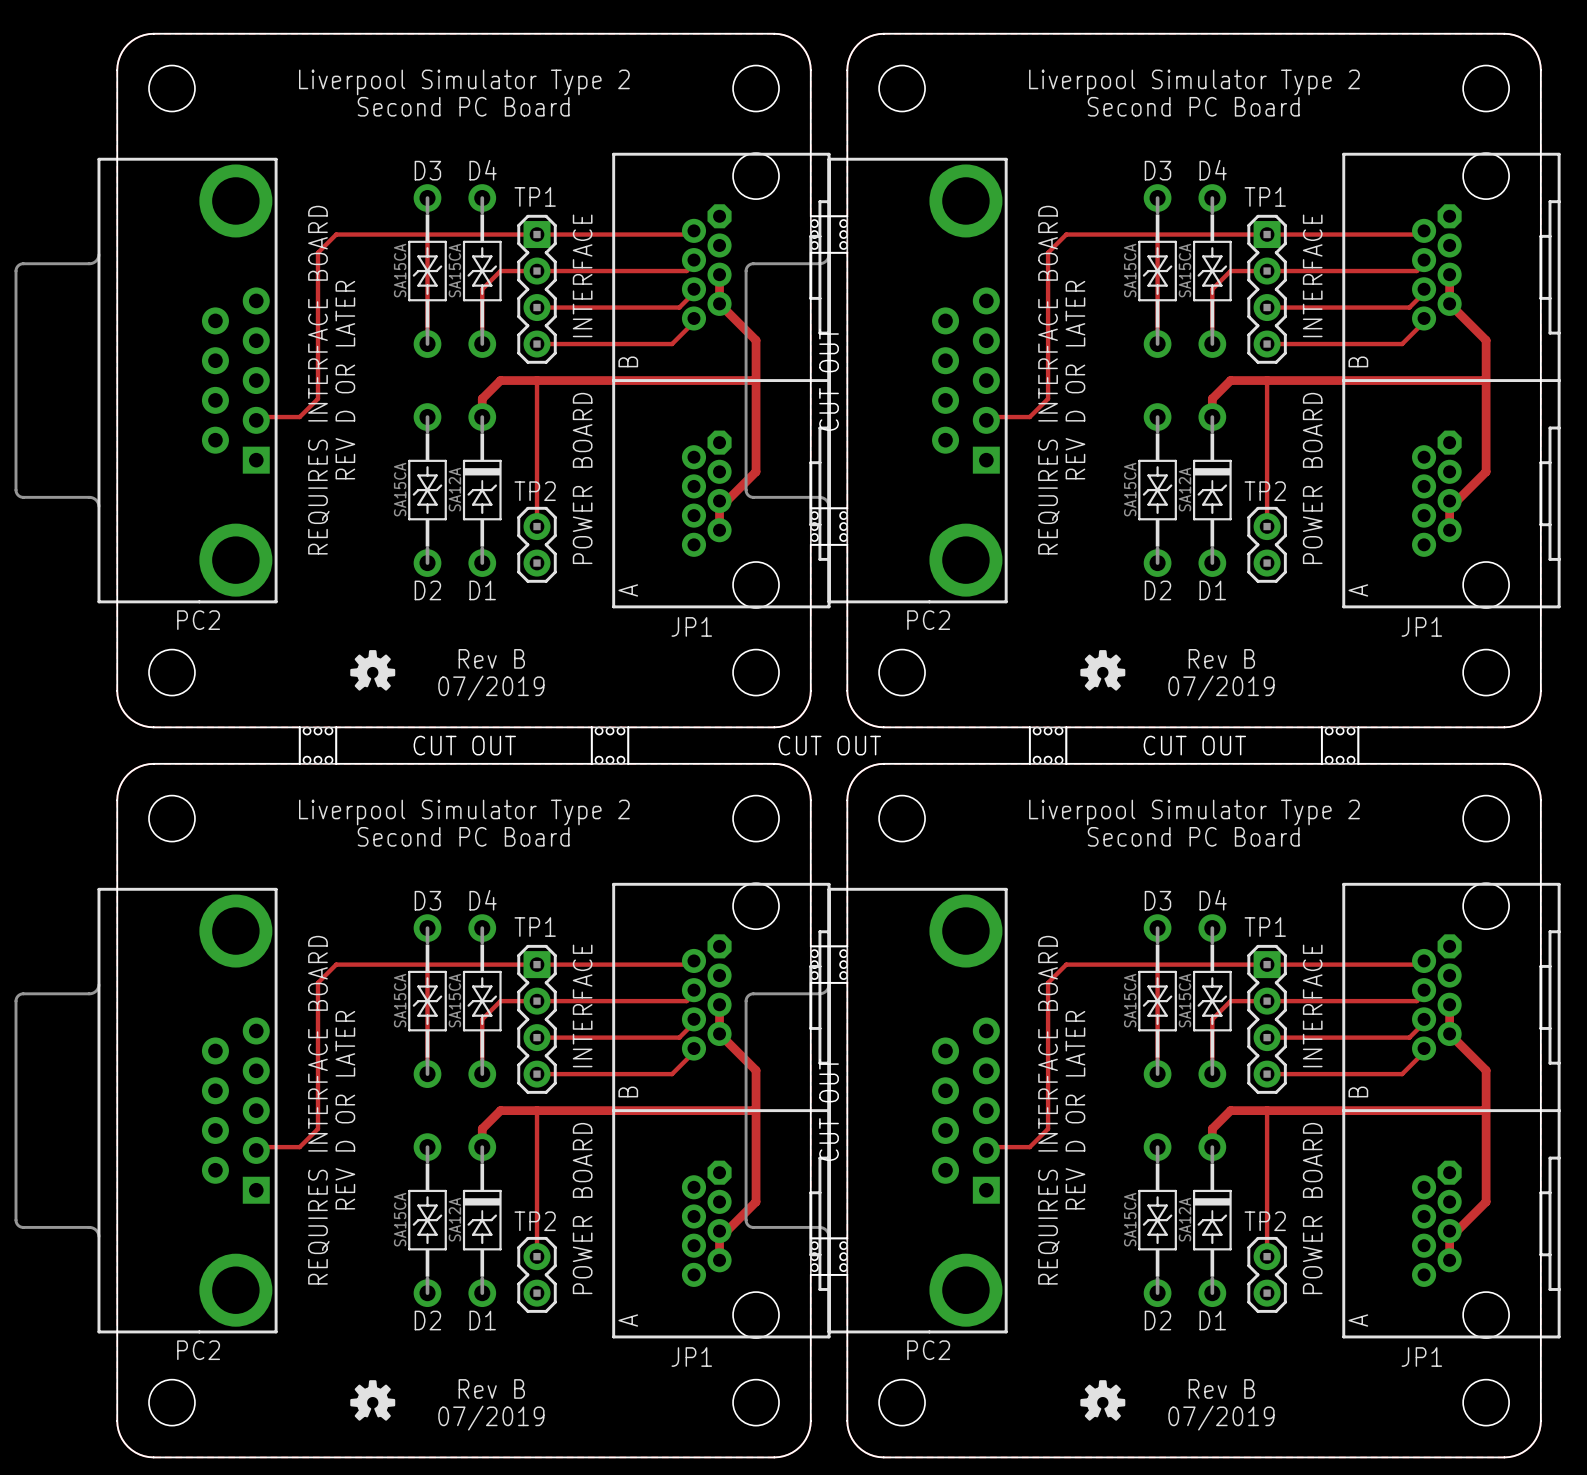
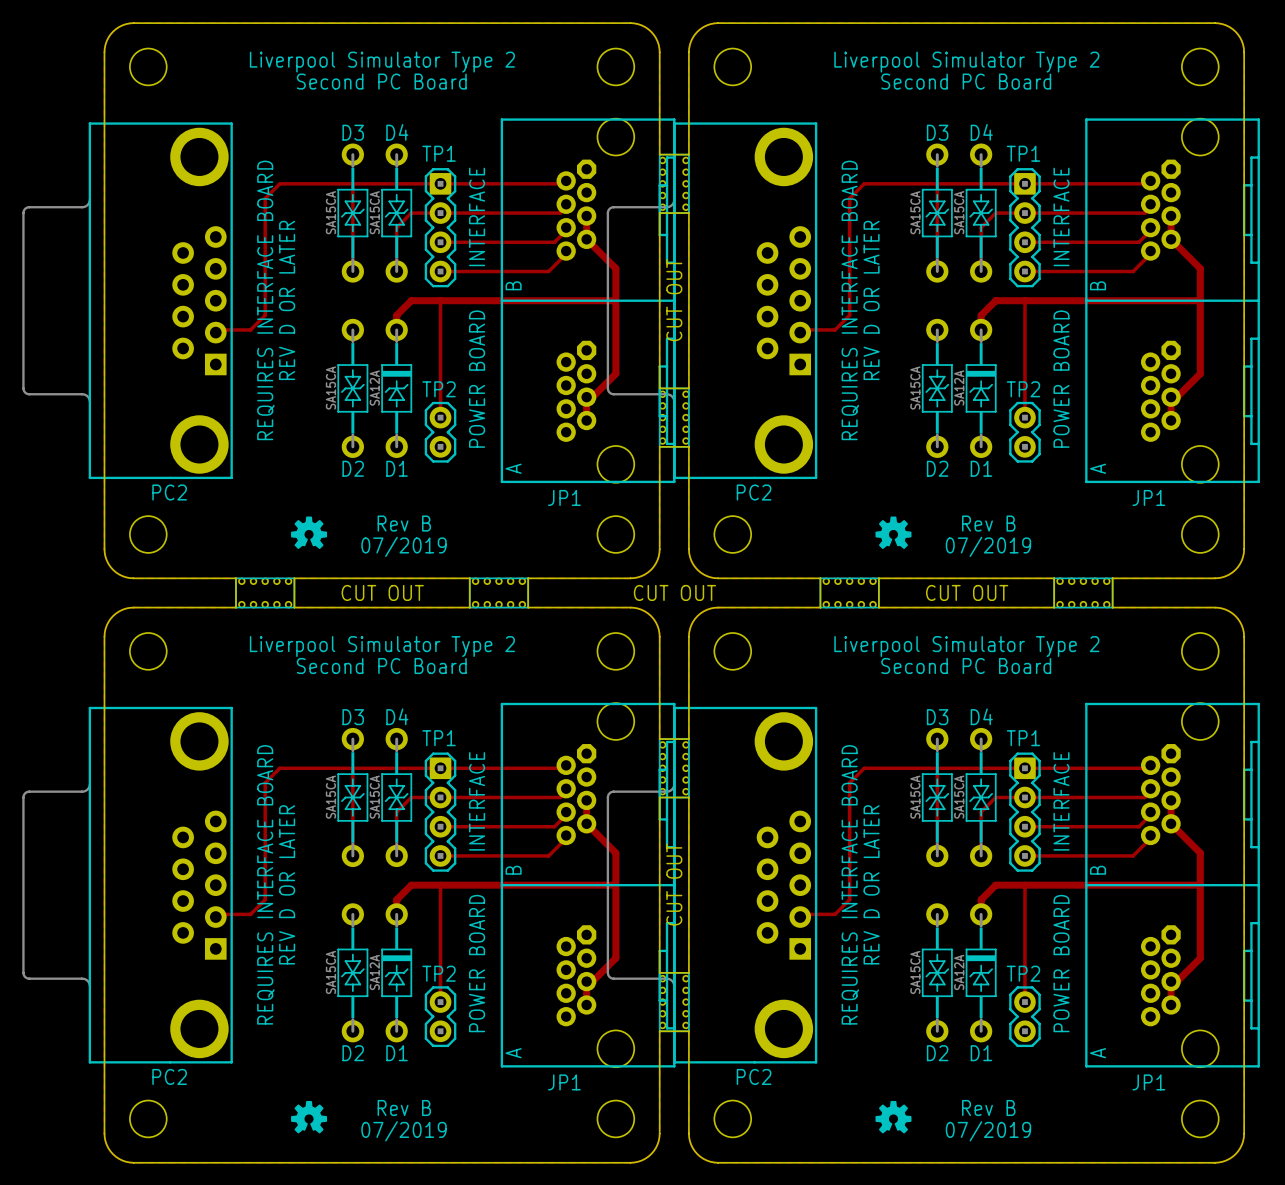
part footprint: [116, 32, 1542, 1459] -> [103, 22, 1245, 1164]

